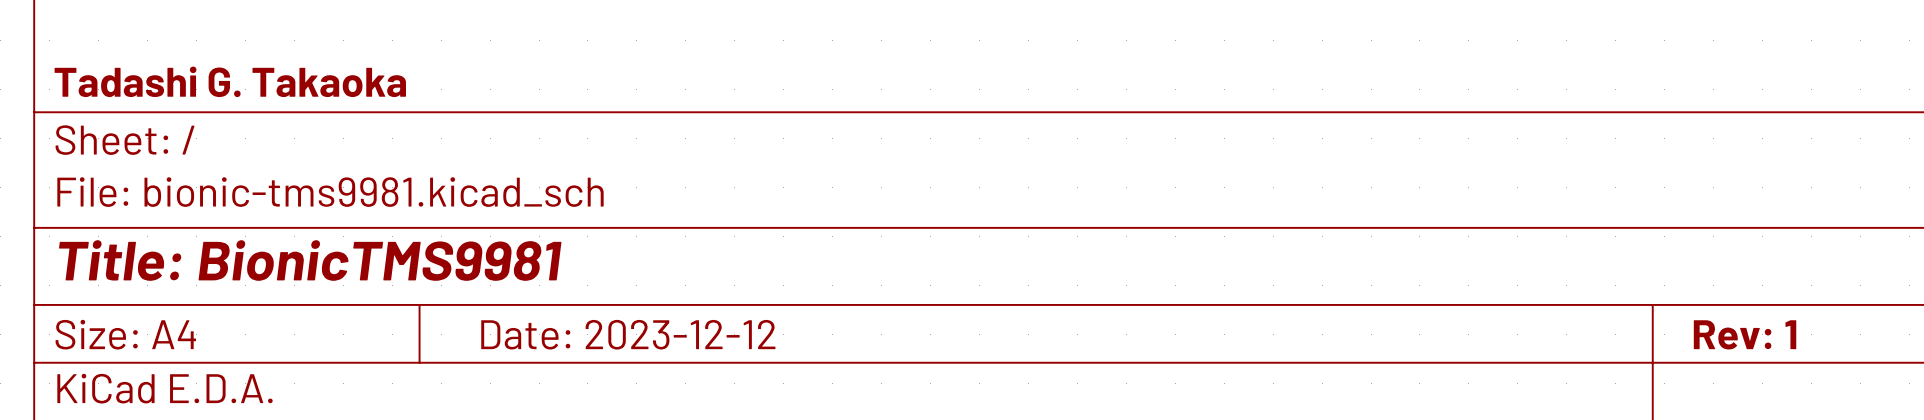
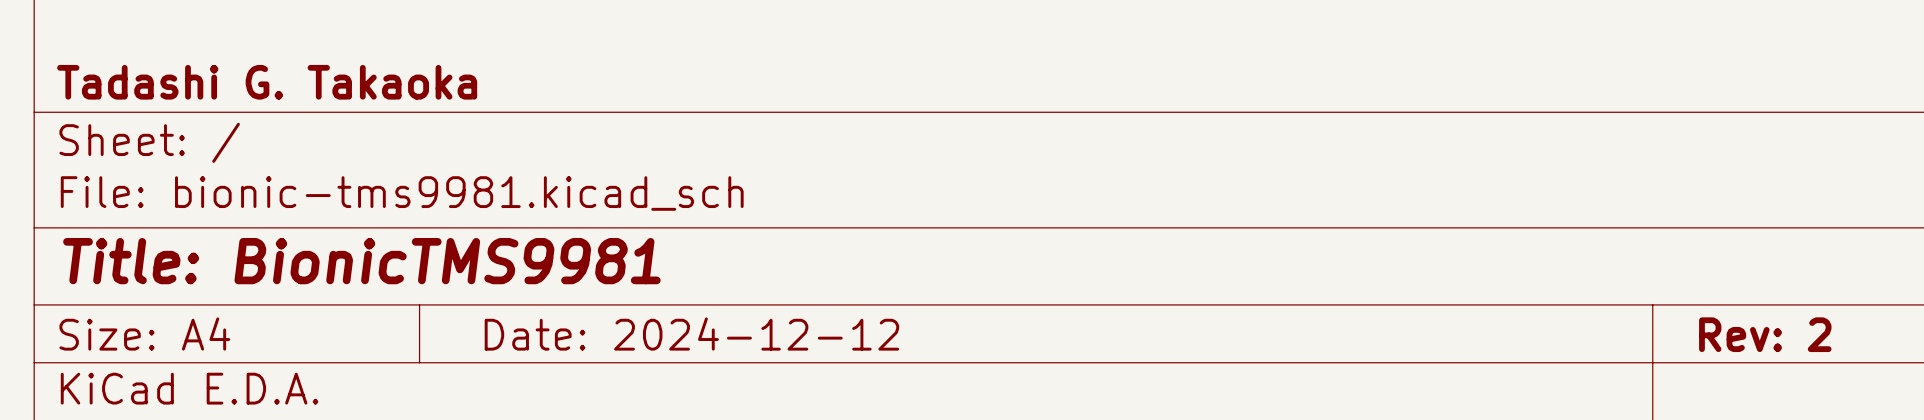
title block: Date: 2023-12-12 (628, 334) -> Date: 2024-12-12 (691, 334)
title block: Rev: 1 (1745, 334) -> Rev: 2 (1765, 334)

